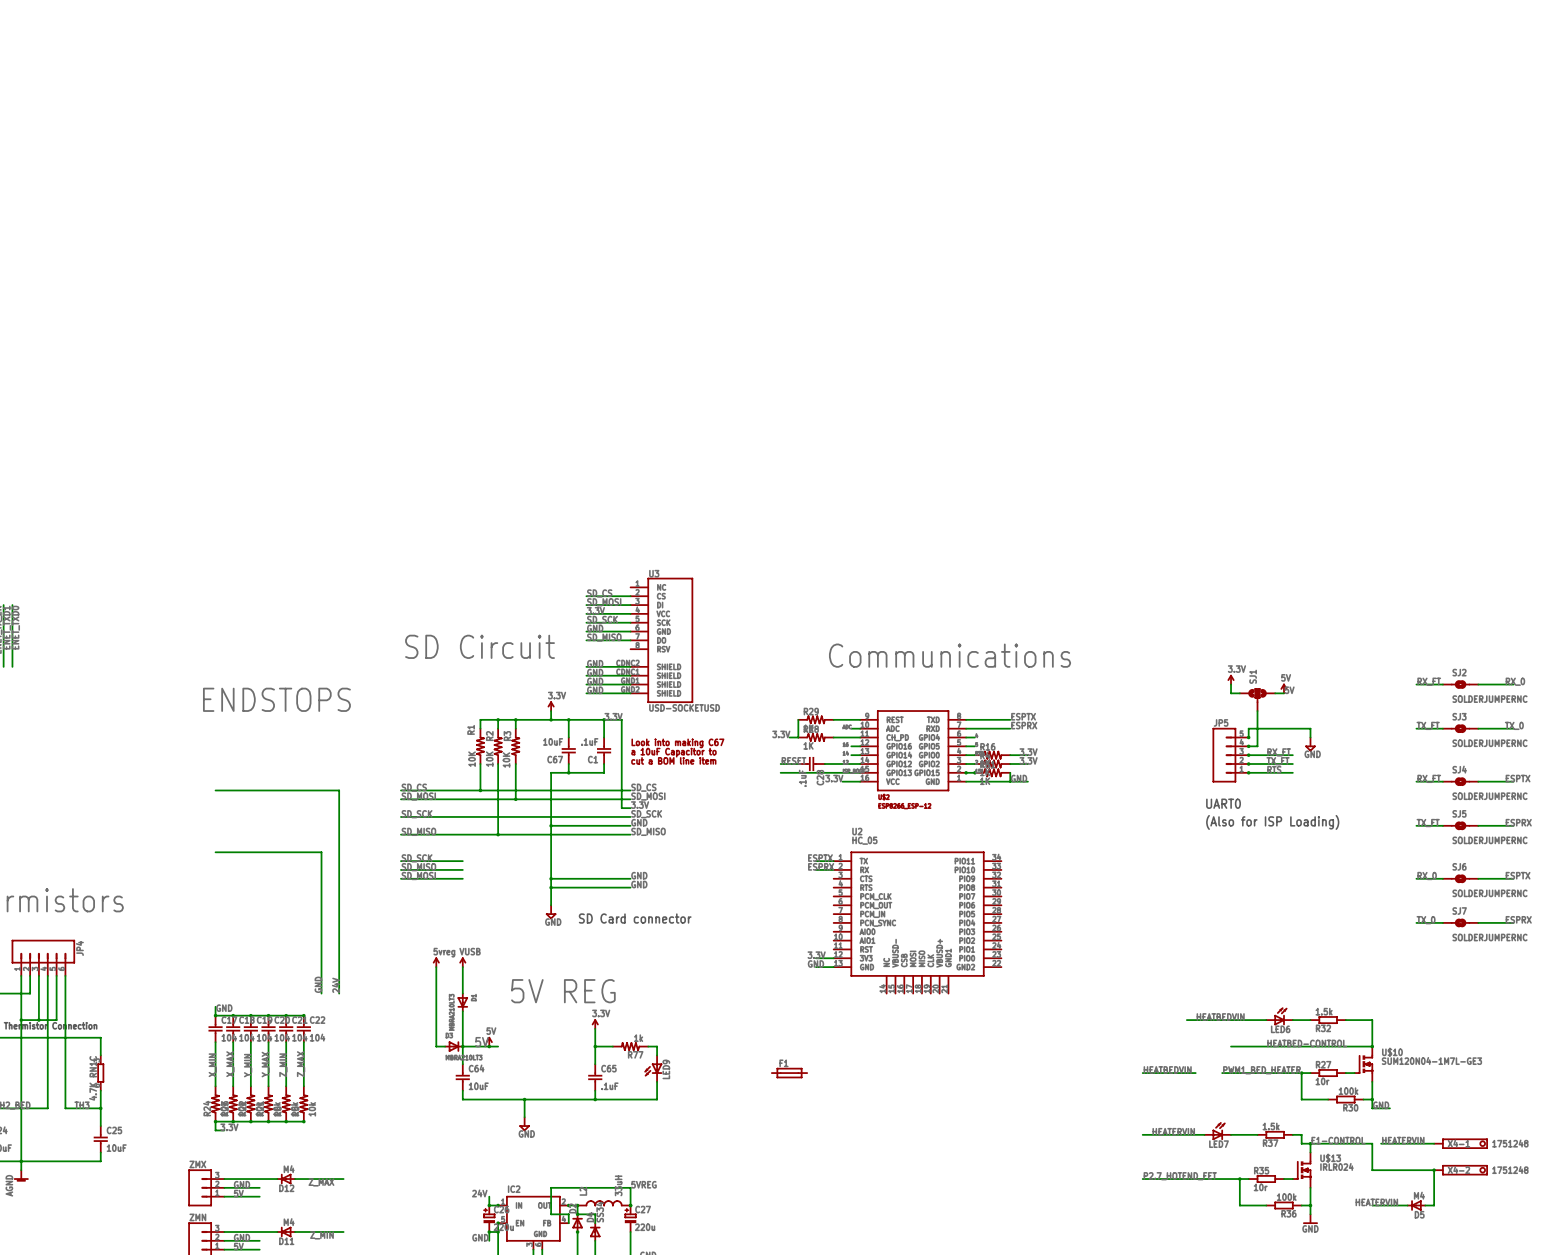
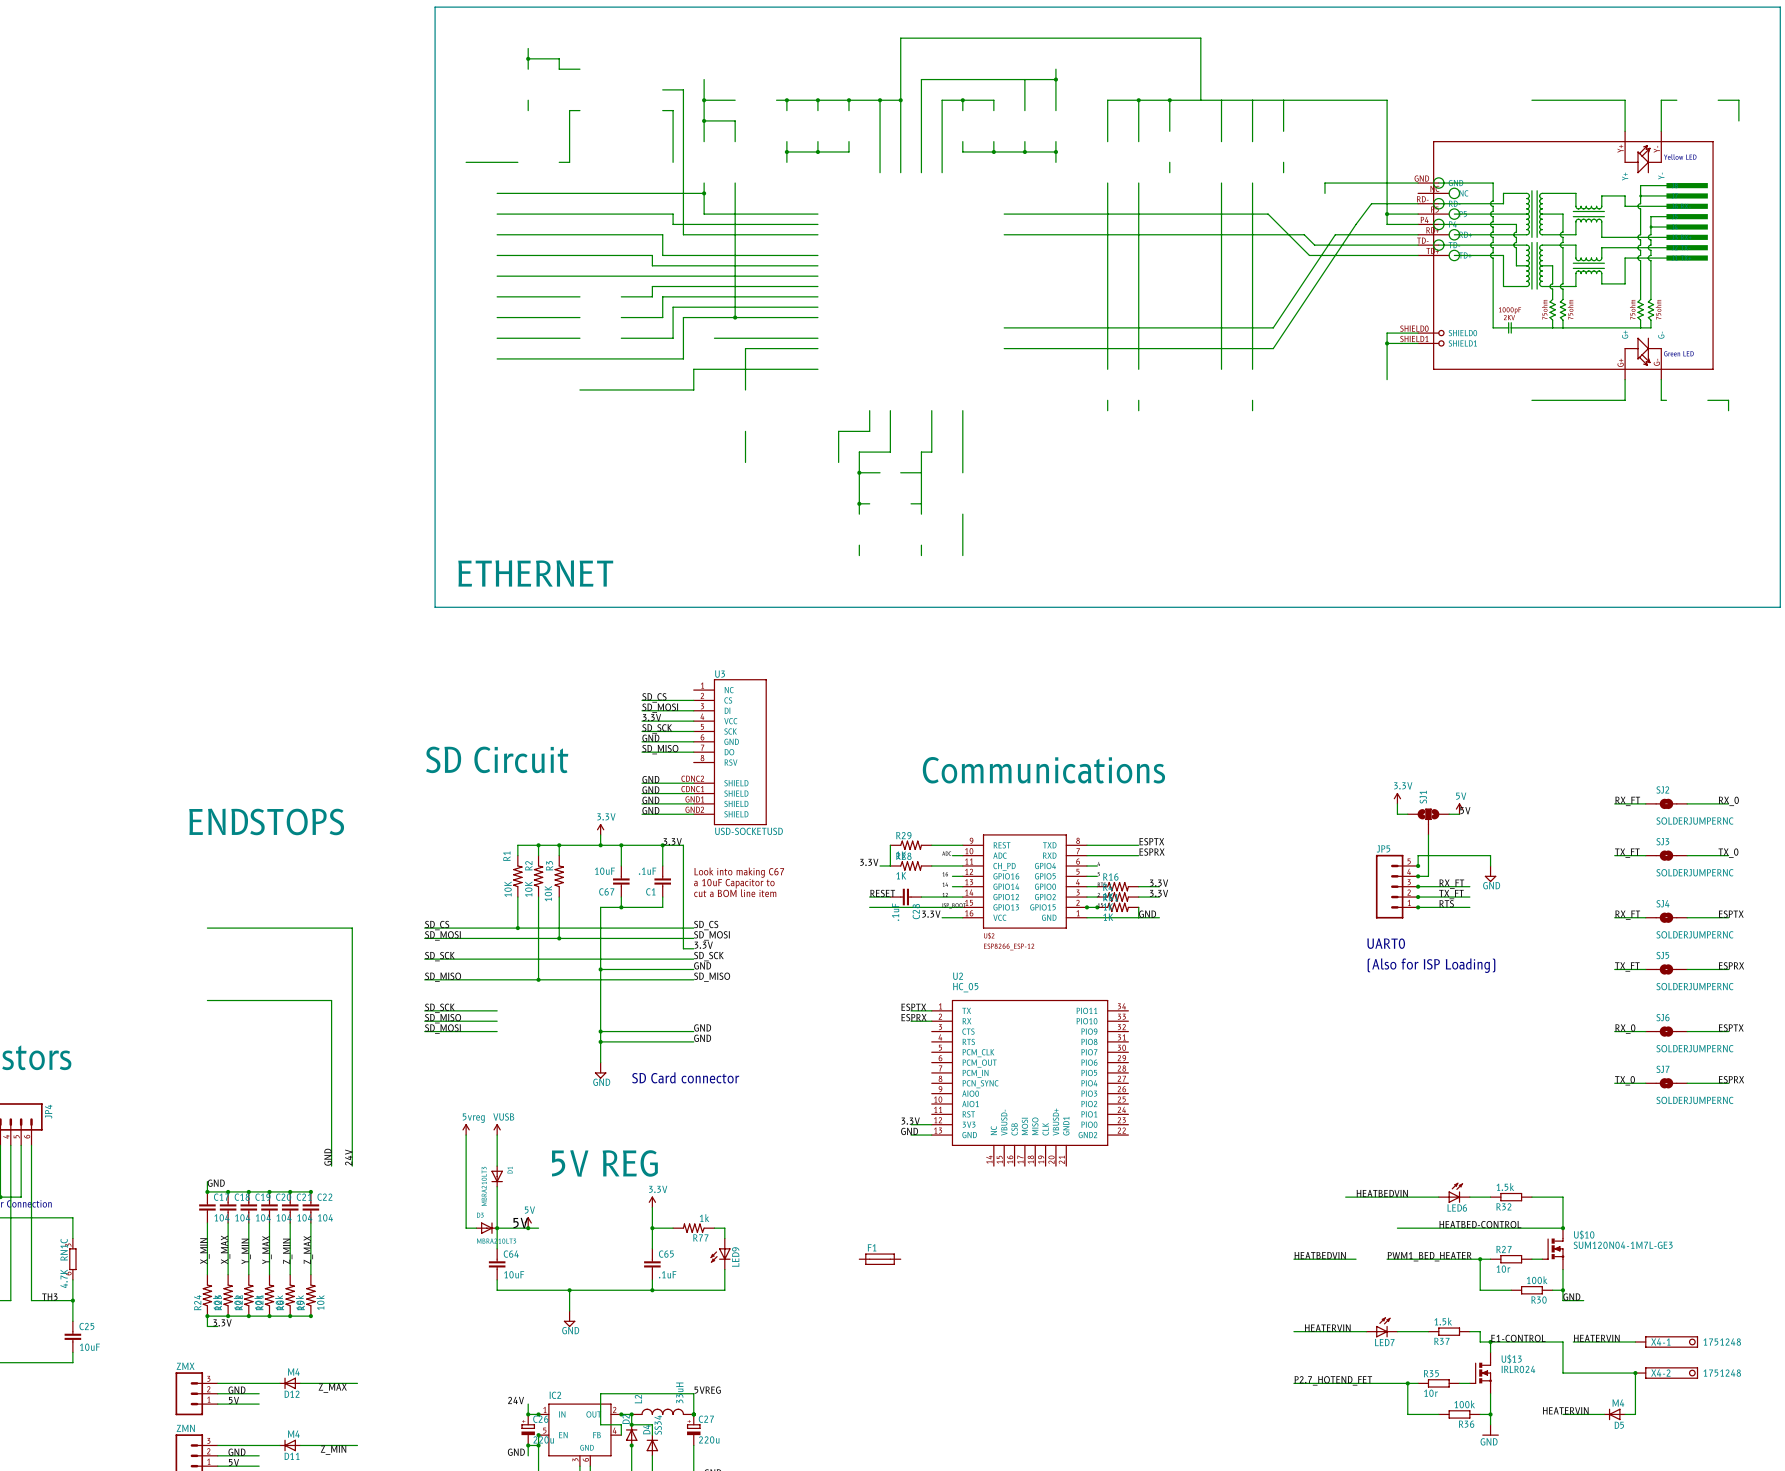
line: none -> (435, 7) (1780, 7) (1780, 607) (435, 607) (435, 7)
wire: none -> (528, 48) (528, 69)
wire: none -> (528, 58) (559, 58) (559, 69) (579, 69)
junction: none -> (528, 58)
wire: none -> (1055, 69) (1055, 110)
wire: none -> (704, 79) (704, 141)
wire: none -> (1024, 79) (1024, 110)
wire: none -> (1055, 79) (921, 79) (921, 172)
junction: none -> (1055, 79)
wire: none -> (662, 89) (683, 89) (683, 234) (817, 234)
wire: none -> (528, 100) (528, 110)
wire: none -> (704, 100) (735, 100)
junction: none -> (704, 100)
wire: none -> (776, 100) (900, 100)
wire: none -> (786, 100) (786, 110)
junction: none -> (786, 100)
wire: none -> (817, 100) (817, 110)
junction: none -> (817, 100)
wire: none -> (848, 100) (848, 110)
junction: none -> (848, 100)
wire: none -> (880, 100) (880, 172)
junction: none -> (880, 100)
junction: none -> (900, 100)
wire: none -> (962, 100) (962, 110)
junction: none -> (962, 100)
wire: none -> (1138, 100) (1138, 141)
junction: none -> (1138, 100)
wire: none -> (1169, 100) (1169, 131)
junction: none -> (1169, 100)
wire: none -> (1200, 100) (1200, 38) (900, 38) (900, 172)
wire: none -> (1221, 100) (1221, 141)
wire: none -> (1252, 100) (1252, 141)
wire: none -> (1283, 100) (1283, 131)
wire: none -> (1531, 100) (1625, 100) (1625, 131)
wire: none -> (1676, 100) (1661, 100) (1661, 131)
wire: none -> (1718, 100) (1738, 100) (1738, 120)
wire: none -> (579, 110) (569, 110) (569, 162) (559, 162)
wire: none -> (662, 110) (673, 110) (673, 162)
wire: none -> (993, 110) (993, 100) (942, 100) (942, 172)
wire: none -> (704, 120) (735, 120) (735, 141)
junction: none -> (704, 120)
wire: none -> (786, 141) (786, 162)
wire: none -> (817, 141) (817, 151)
wire: none -> (848, 141) (848, 151) (786, 151)
wire: none -> (962, 141) (962, 151) (1055, 151)
wire: none -> (993, 141) (993, 151)
wire: none -> (1024, 141) (1024, 151)
wire: none -> (1055, 141) (1055, 162)
wire: none -> (1107, 141) (1107, 100) (1387, 100) (1387, 224) (1418, 224)
junction: none -> (786, 151)
junction: none -> (817, 151)
junction: none -> (993, 151)
junction: none -> (1024, 151)
junction: none -> (1055, 151)
wire: none -> (466, 162) (517, 162)
wire: none -> (1169, 162) (1169, 172)
wire: none -> (1283, 162) (1283, 172)
wire: none -> (704, 183) (704, 214) (817, 214)
wire: none -> (735, 183) (735, 317)
wire: none -> (1107, 183) (1107, 369)
wire: none -> (1138, 183) (1138, 369)
wire: none -> (1221, 183) (1221, 369)
wire: none -> (1252, 183) (1252, 369)
wire: none -> (1418, 183) (1324, 183) (1324, 193)
wire: none -> (497, 193) (704, 193)
junction: none -> (704, 193)
wire: none -> (1418, 203) (1371, 203) (1273, 348) (1004, 348)
wire: none -> (497, 214) (673, 214) (673, 224) (817, 224)
wire: none -> (1004, 214) (1268, 214) (1309, 255) (1418, 255)
wire: none -> (1387, 214) (1418, 214)
junction: none -> (1387, 214)
wire: none -> (497, 234) (662, 234) (662, 255) (817, 255)
wire: none -> (1004, 234) (1304, 234) (1314, 245) (1418, 245)
wire: none -> (1418, 234) (1335, 234) (1273, 327) (1004, 327)
wire: none -> (497, 255) (652, 255) (652, 265) (817, 265)
part: none -> (1565, 255)
wire: none -> (497, 276) (817, 276)
wire: none -> (817, 286) (652, 286) (652, 296) (621, 296)
wire: none -> (497, 296) (579, 296)
wire: none -> (817, 296) (662, 296) (662, 317) (621, 317)
wire: none -> (817, 307) (673, 307) (673, 338) (621, 338)
wire: none -> (497, 317) (579, 317)
junction: none -> (735, 317)
wire: none -> (817, 317) (683, 317) (683, 358) (497, 358)
wire: none -> (1418, 333) (1387, 333) (1387, 379)
wire: none -> (497, 338) (579, 338)
wire: none -> (714, 338) (817, 338)
wire: none -> (1387, 343) (1418, 343)
junction: none -> (1387, 343)
wire: none -> (817, 348) (745, 348) (745, 389)
wire: none -> (817, 369) (693, 369) (693, 389) (579, 389)
wire: none -> (1625, 379) (1625, 400) (1531, 400)
wire: none -> (1661, 379) (1661, 400) (1666, 400)
wire: none -> (1107, 400) (1107, 410)
wire: none -> (1138, 400) (1138, 410)
wire: none -> (1252, 400) (1252, 410)
wire: none -> (1707, 400) (1728, 400) (1728, 410)
wire: none -> (869, 410) (869, 431) (838, 431) (838, 462)
wire: none -> (890, 410) (890, 452) (859, 452) (859, 514)
wire: none -> (931, 410) (931, 452) (921, 452) (921, 514)
wire: none -> (962, 410) (962, 472)
wire: none -> (745, 431) (745, 462)
wire: none -> (859, 472) (880, 472)
junction: none -> (859, 472)
wire: none -> (900, 472) (921, 472)
wire: none -> (859, 503) (869, 503)
junction: none -> (859, 503)
wire: none -> (911, 503) (921, 503)
wire: none -> (962, 514) (962, 555)
wire: none -> (859, 545) (859, 555)
wire: none -> (921, 545) (921, 555)
text: none -> ETHERNET (535, 573)

